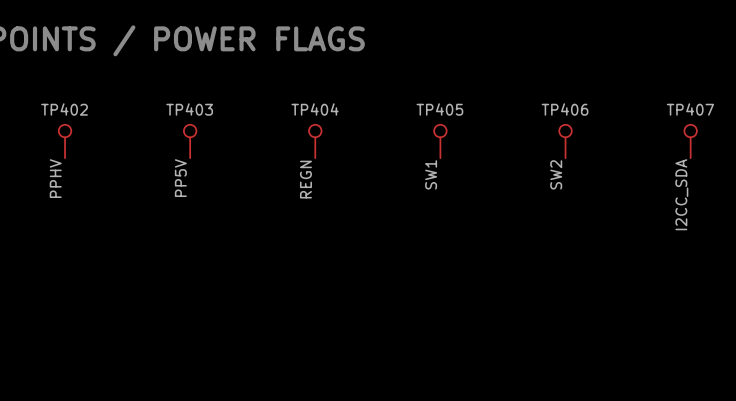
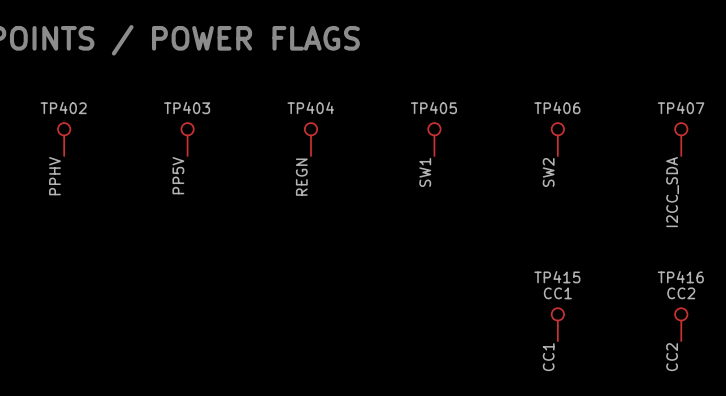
TP415: none -> CC1 (557, 324)
TP416: none -> CC2 (681, 324)
label: none -> CC1 (548, 357)
label: none -> CC2 (672, 357)

